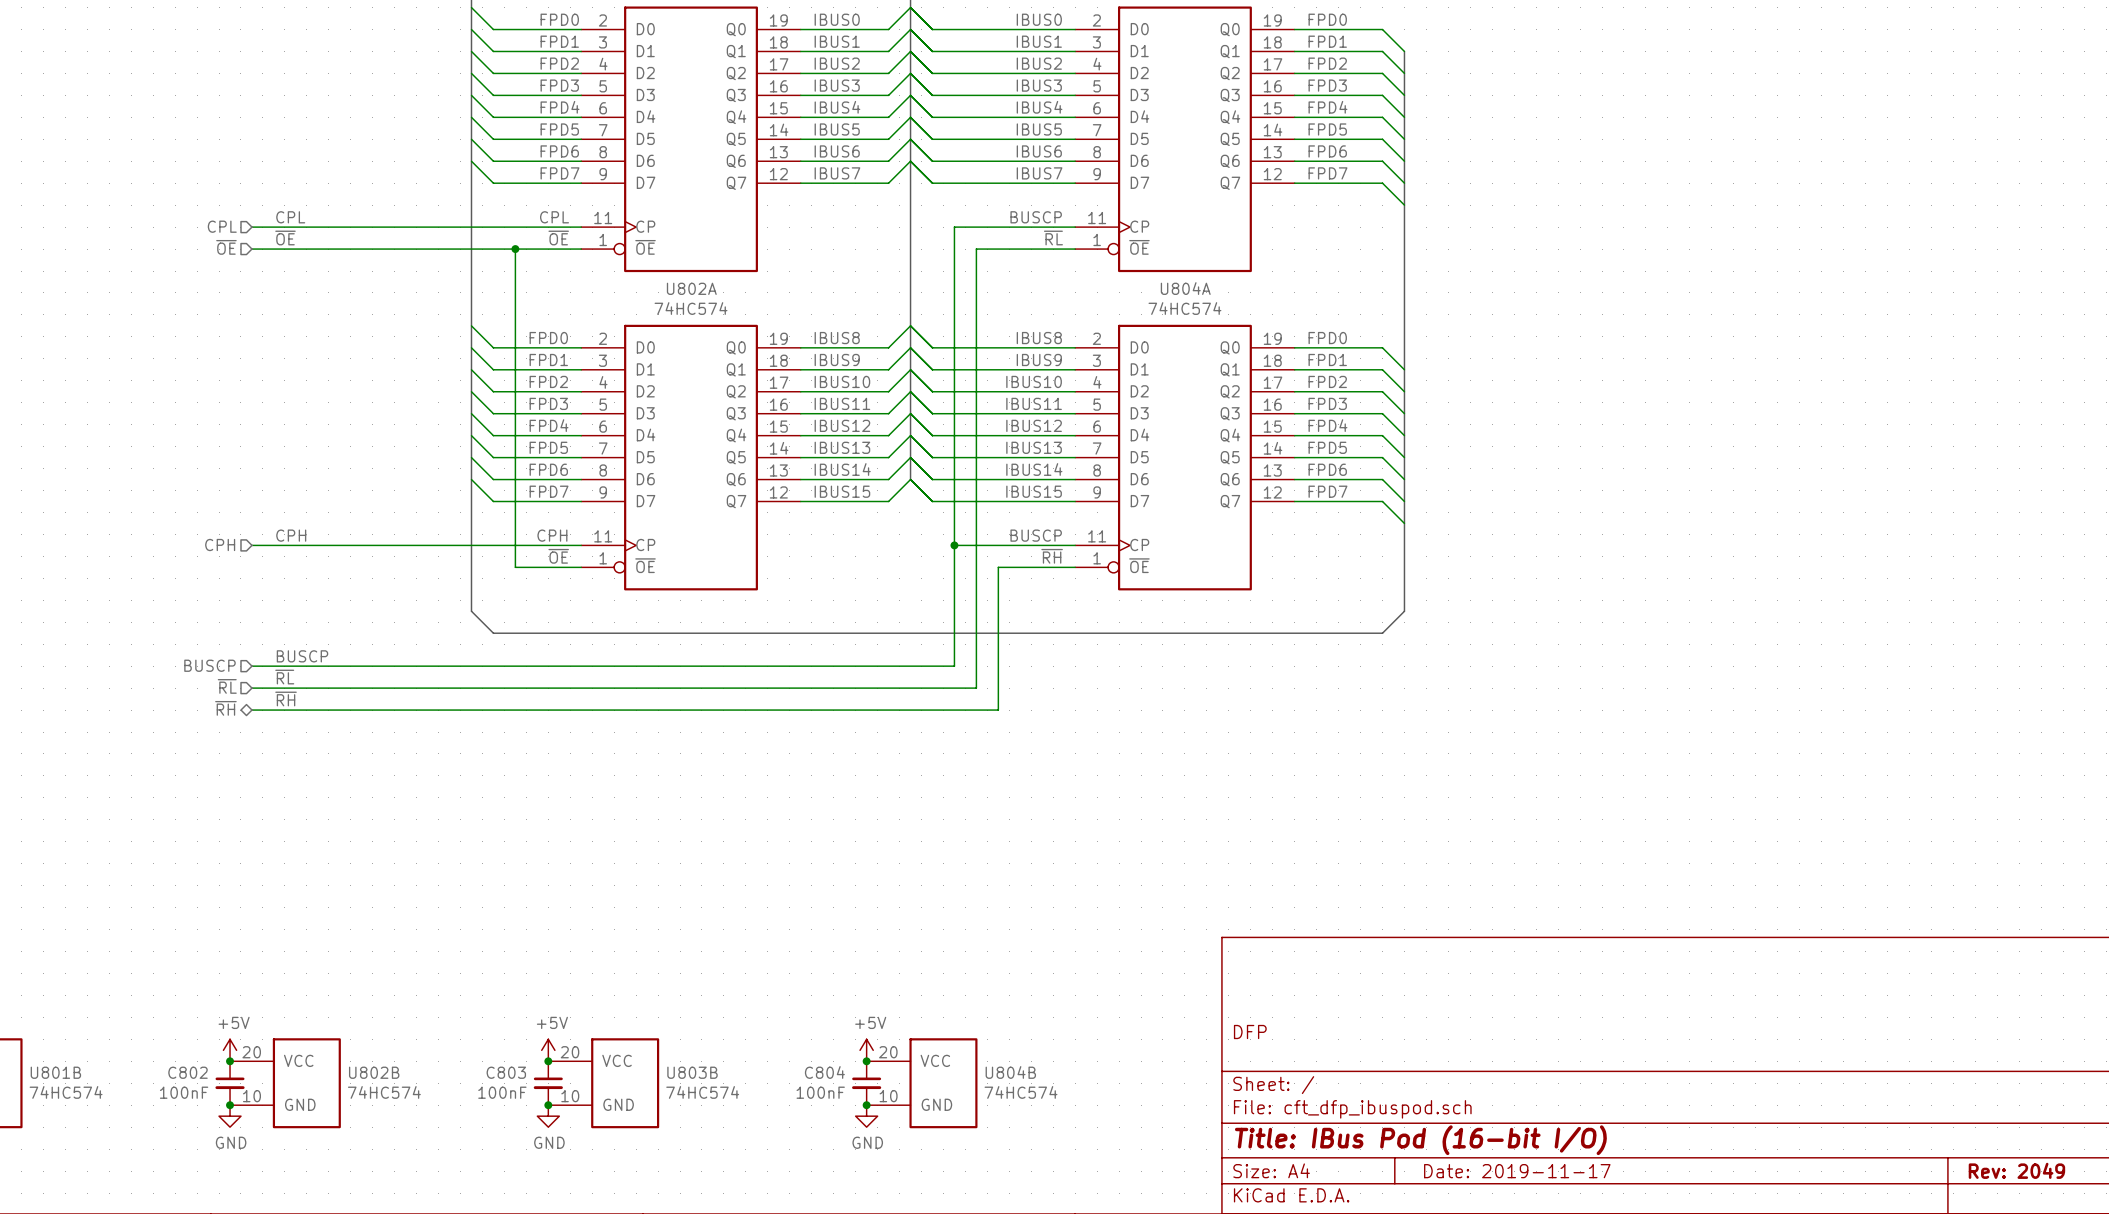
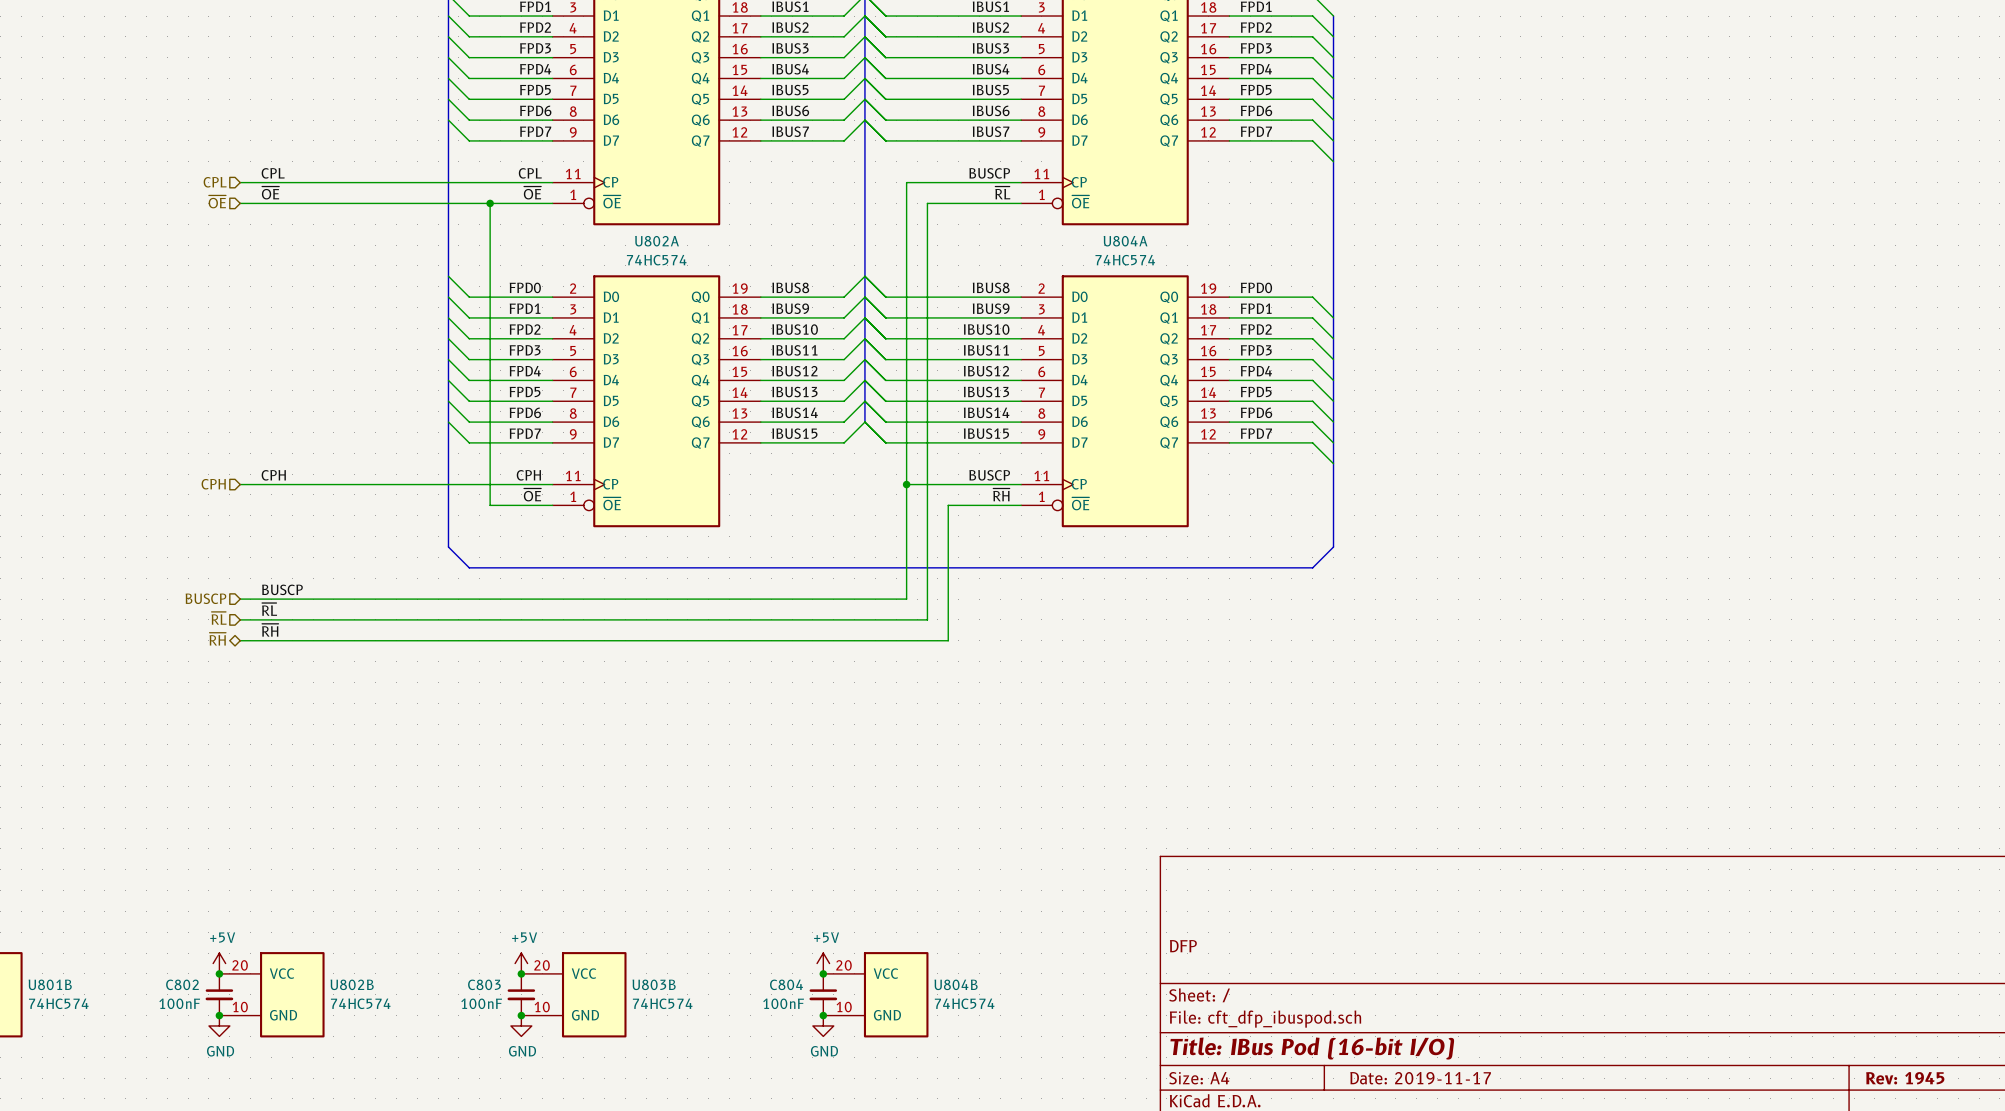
title block: Rev: 2049 (2016, 1170) -> Rev: 1945 (1905, 1078)

